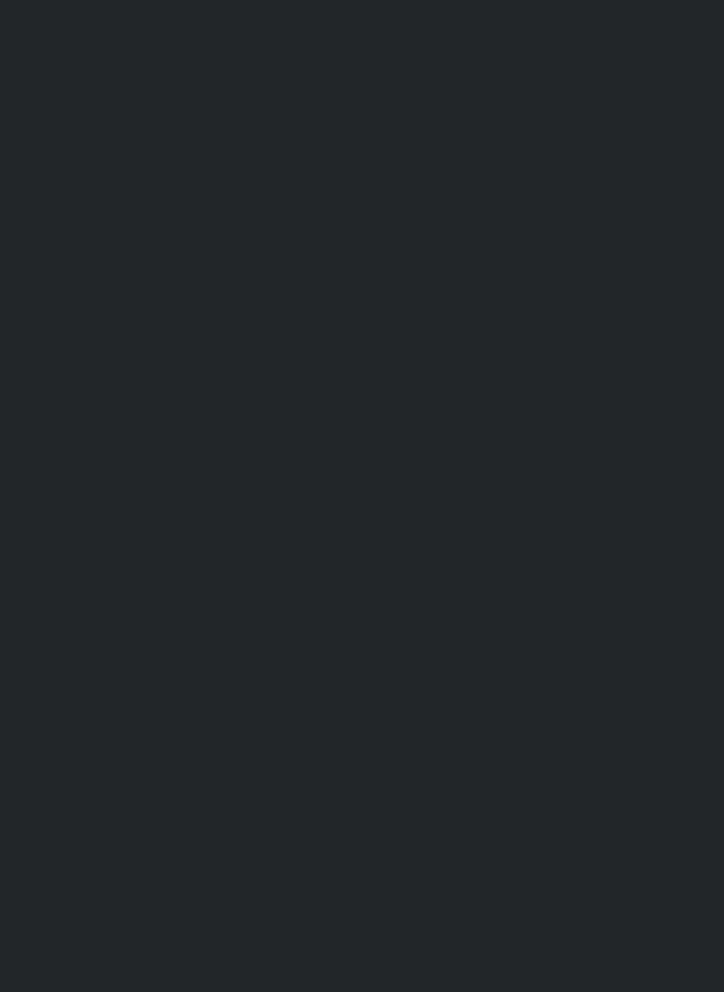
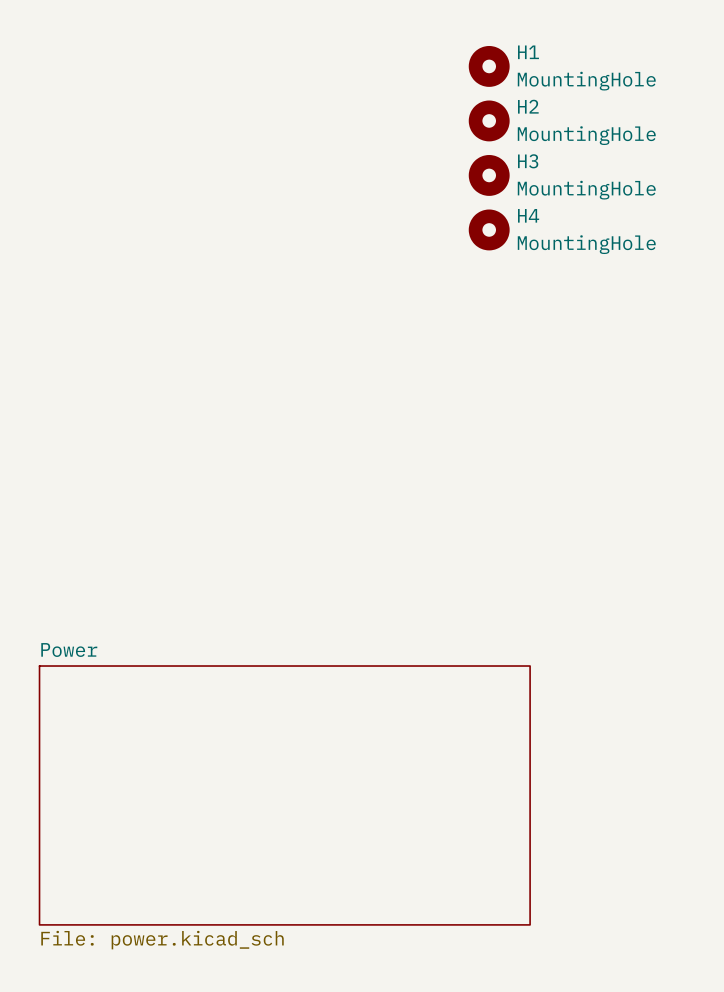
H1: none -> MountingHole (489, 66)
H2: none -> MountingHole (489, 120)
H3: none -> MountingHole (489, 175)
H4: none -> MountingHole (489, 229)
sheet Power: none -> File: power.kicad_sch (284, 795)

